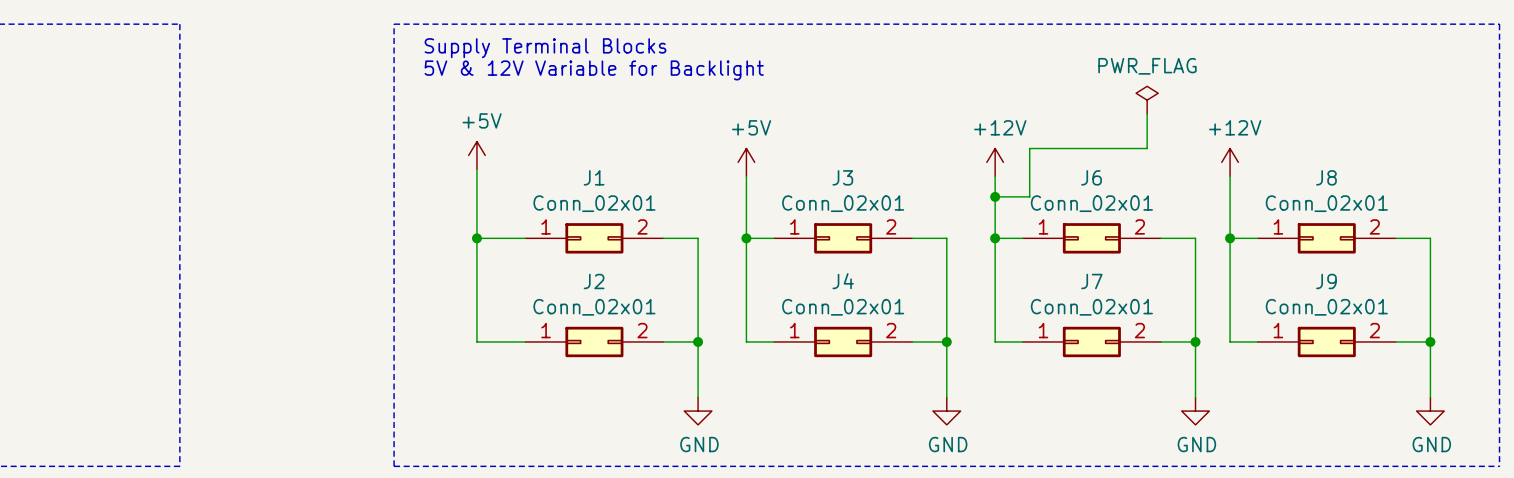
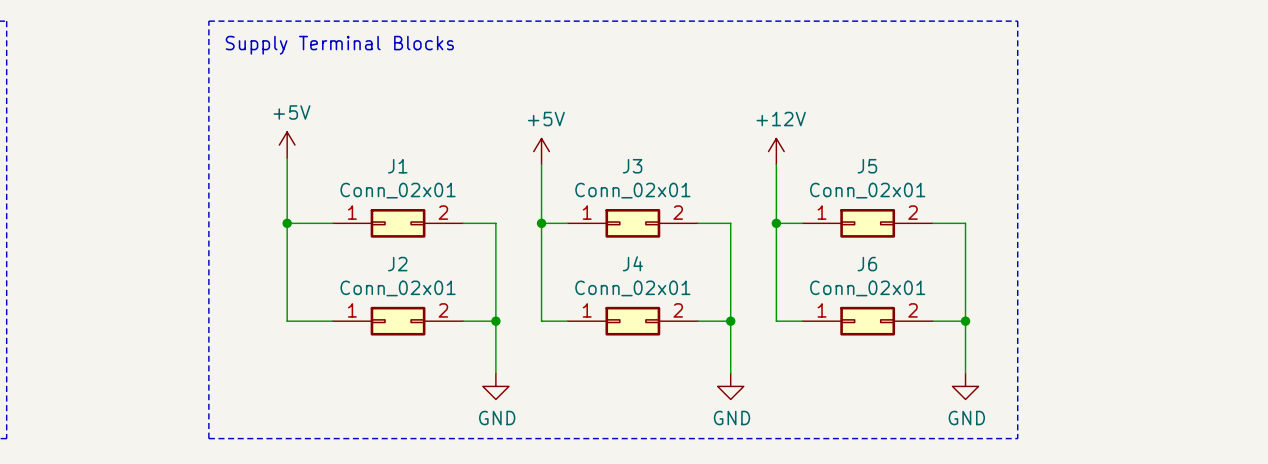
line: (1250, 24) (1499, 24) (1499, 466) (1250, 466) -> (1017, 21) (1017, 438)
text position: Supply Terminal Blocks (545, 48) -> Supply Terminal Blocks (339, 45)
text: 5V & 12V Variable for Backlight (594, 70) -> none
power symbol: PWR_FLAG (1147, 100) -> none
wire: (1147, 113) (1147, 148) (1029, 148) (1029, 196) (995, 196) -> none
power symbol: +12V (1230, 162) -> none
wire: (1230, 176) (1230, 341) (1257, 341) -> none
J6 name: J6 (1091, 177) -> J5 (867, 166)
junction: (995, 196) -> none
wire: (1230, 238) (1257, 238) -> none
junction: (1230, 238) -> none
J8: Conn_02x01 (1326, 238) -> none
wire: (1395, 238) (1430, 238) (1430, 397) -> none
J7 name: J7 (1091, 281) -> J6 (867, 264)
J9: Conn_02x01 (1326, 341) -> none
wire: (1395, 341) (1430, 341) -> none
junction: (1430, 341) -> none
power symbol: GND (1430, 411) -> none

